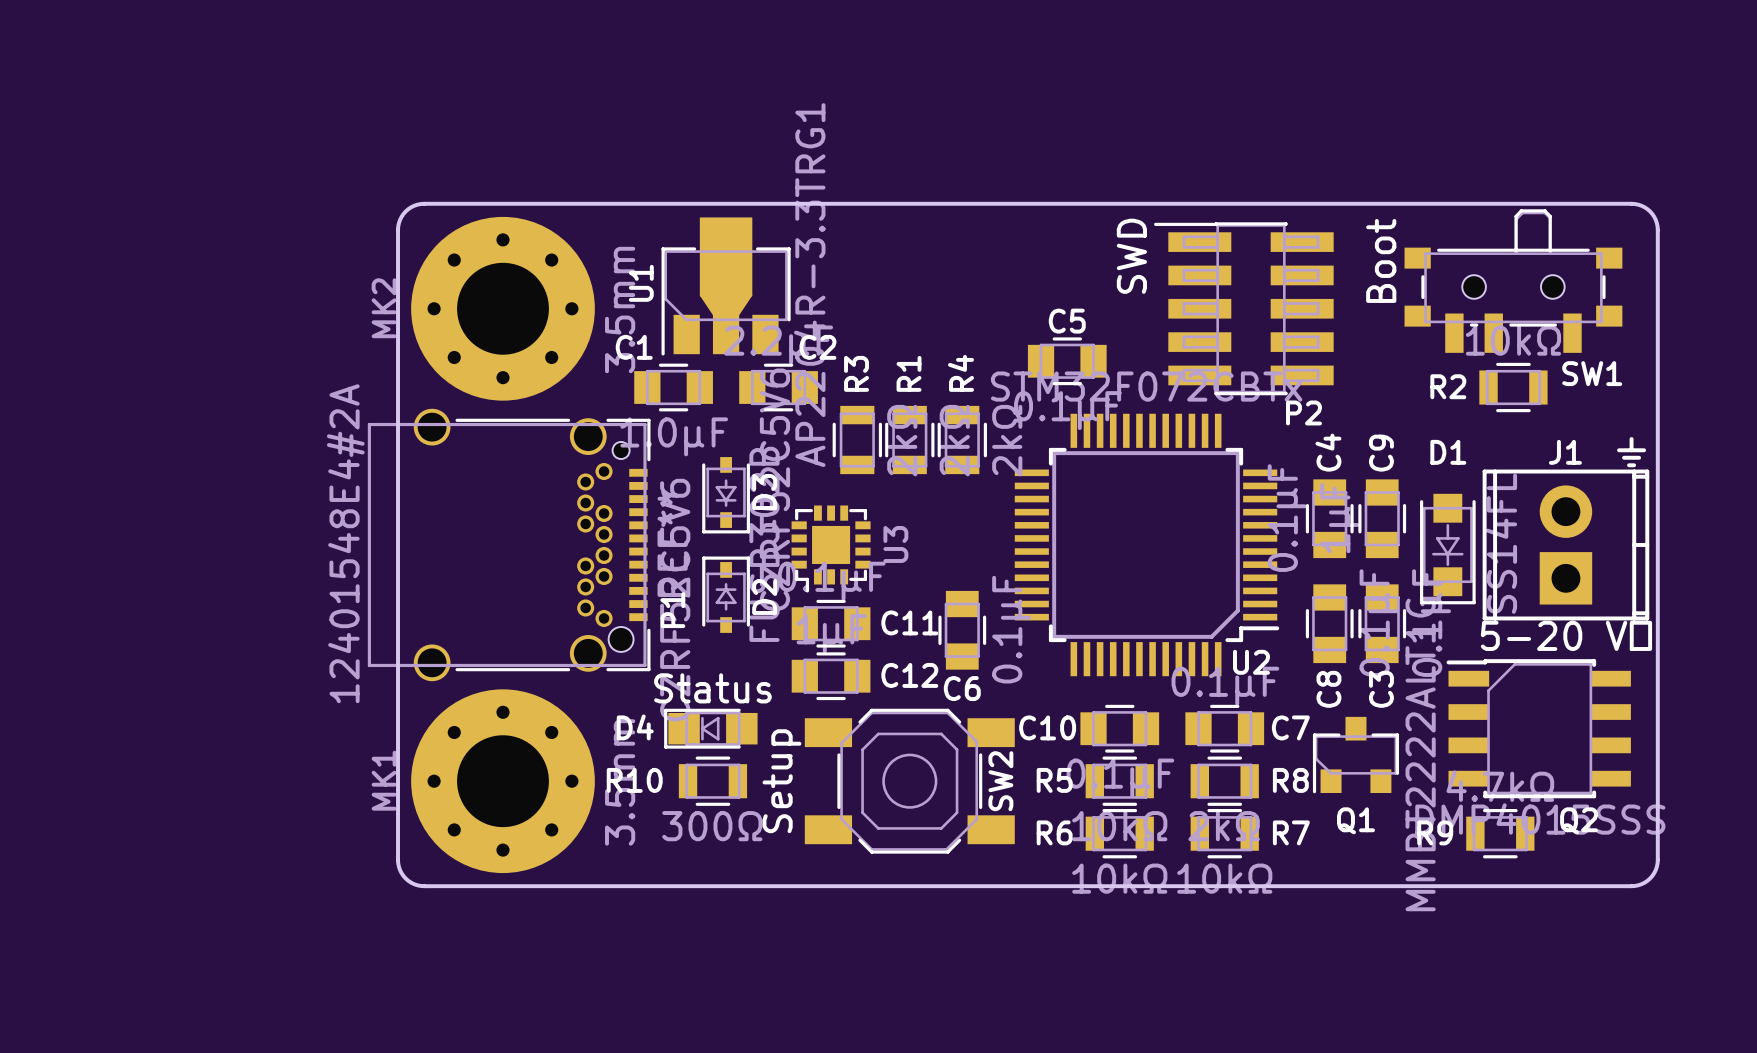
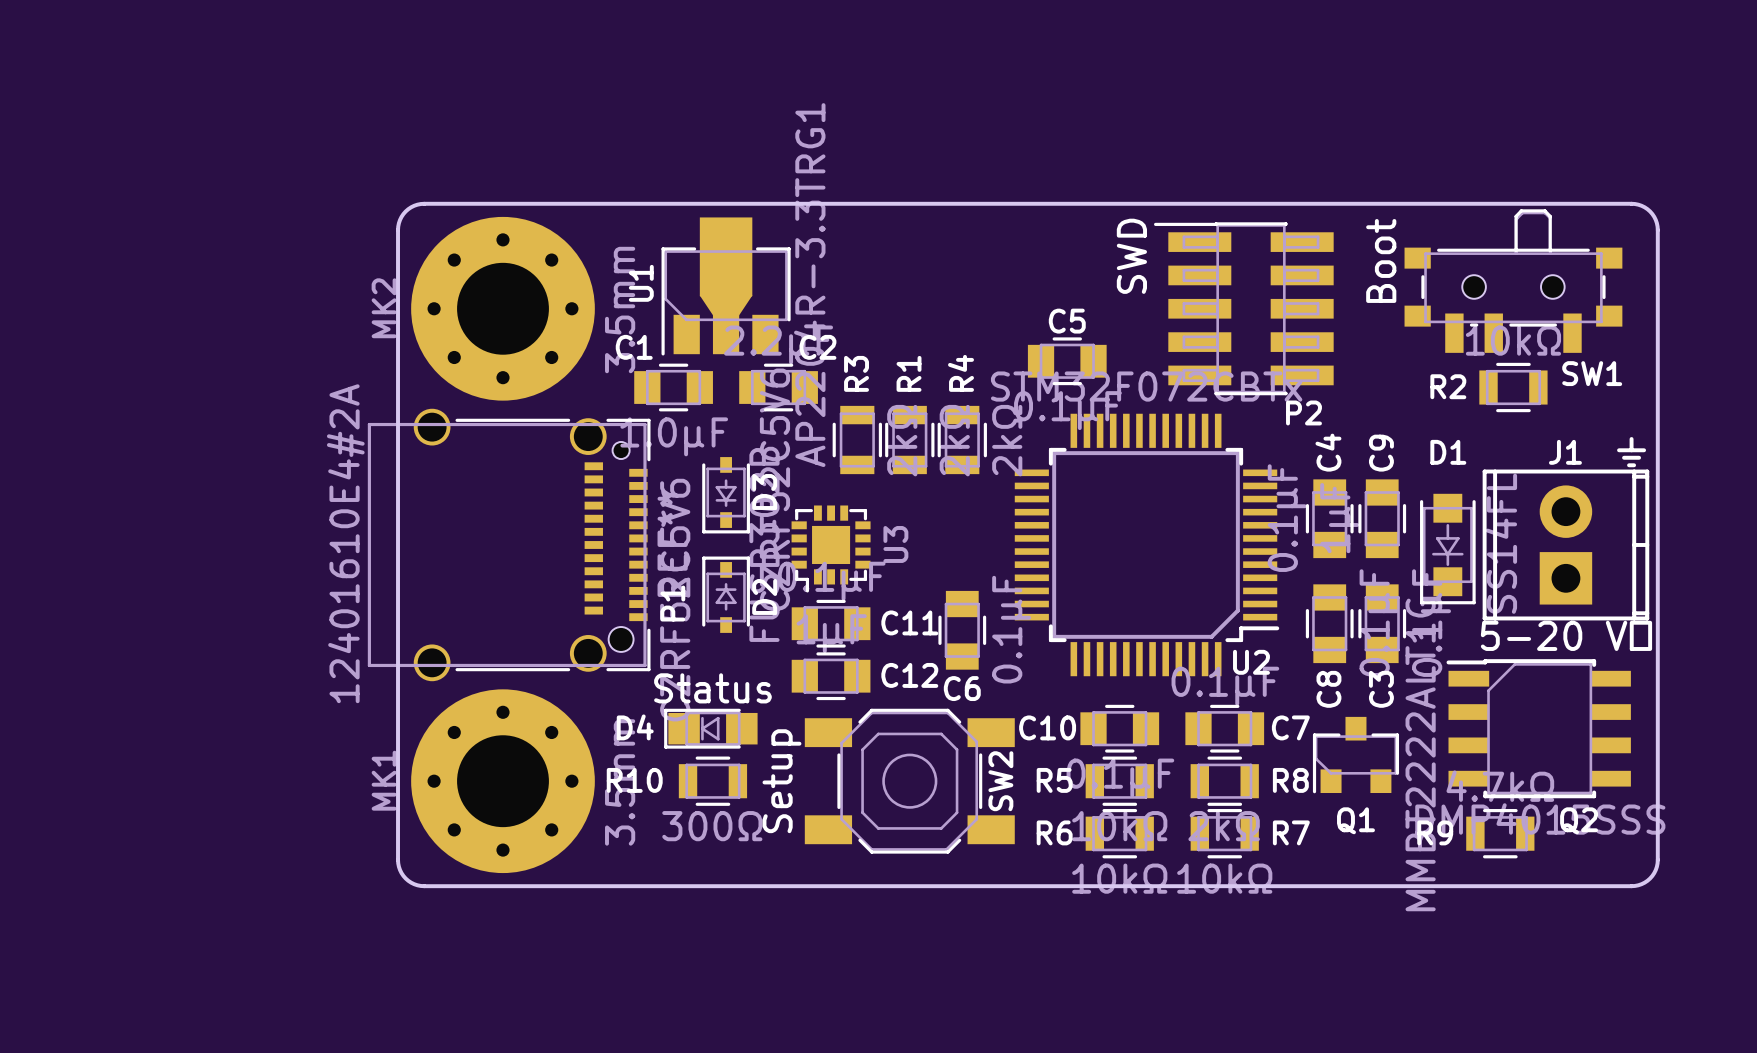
P1 footprint: [367, 408, 651, 682] -> [367, 408, 651, 682]
P1 value: 12401548E4#2A (345, 543) -> 12401610E4#2A (345, 543)

